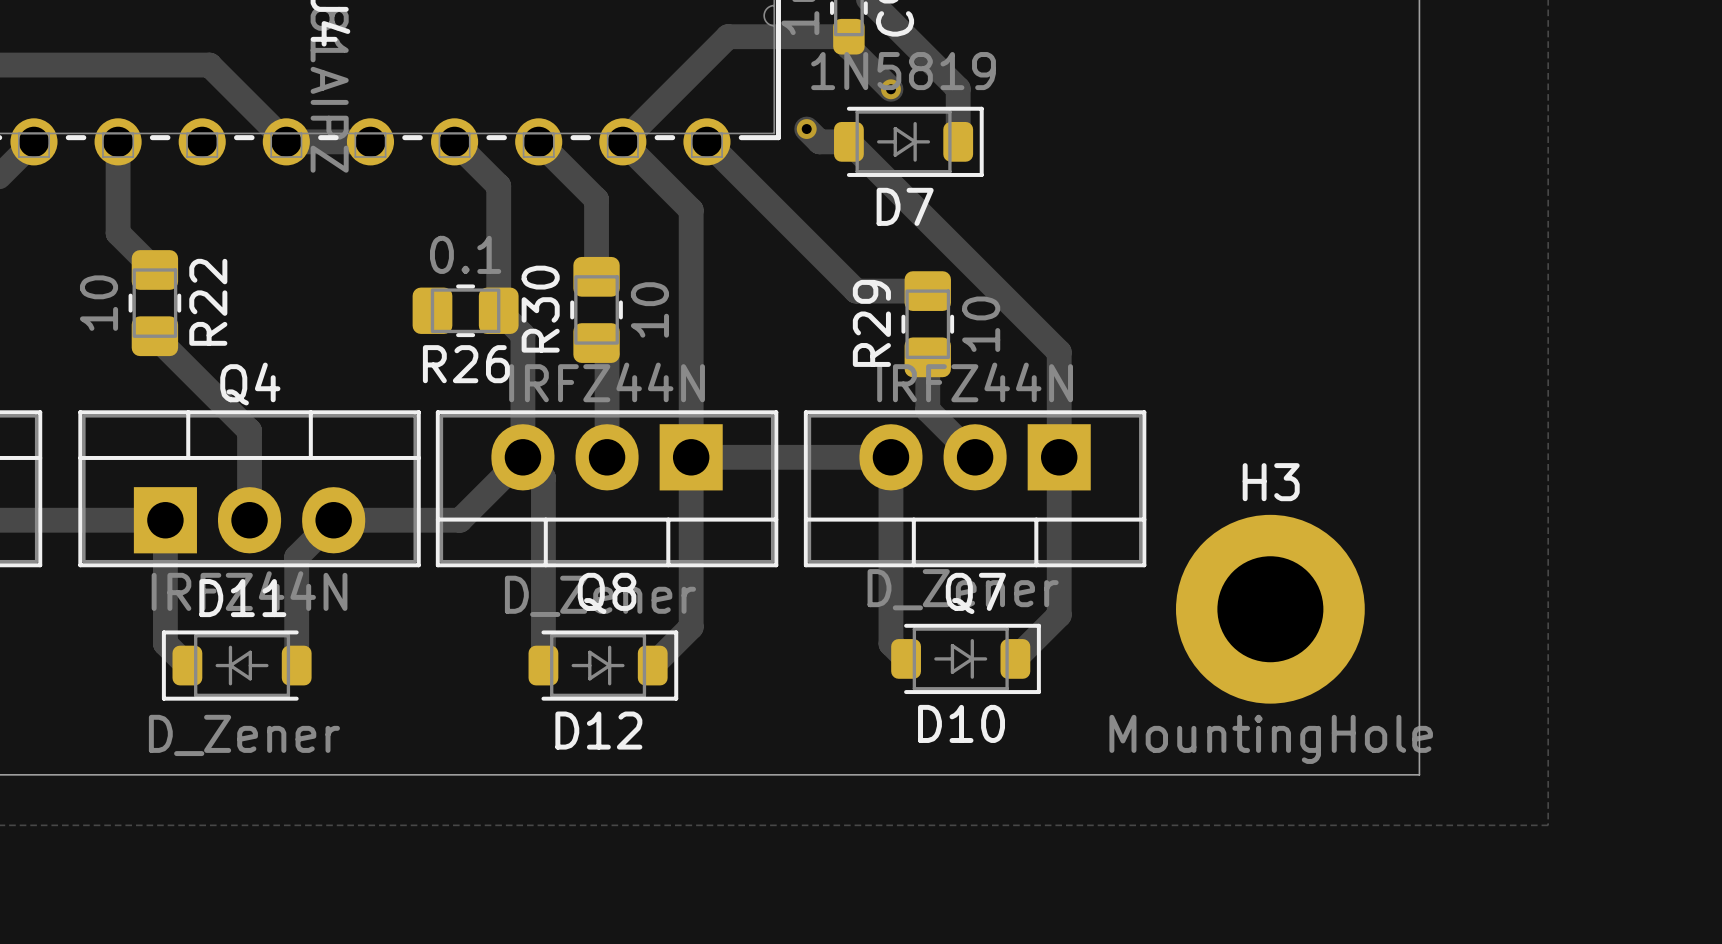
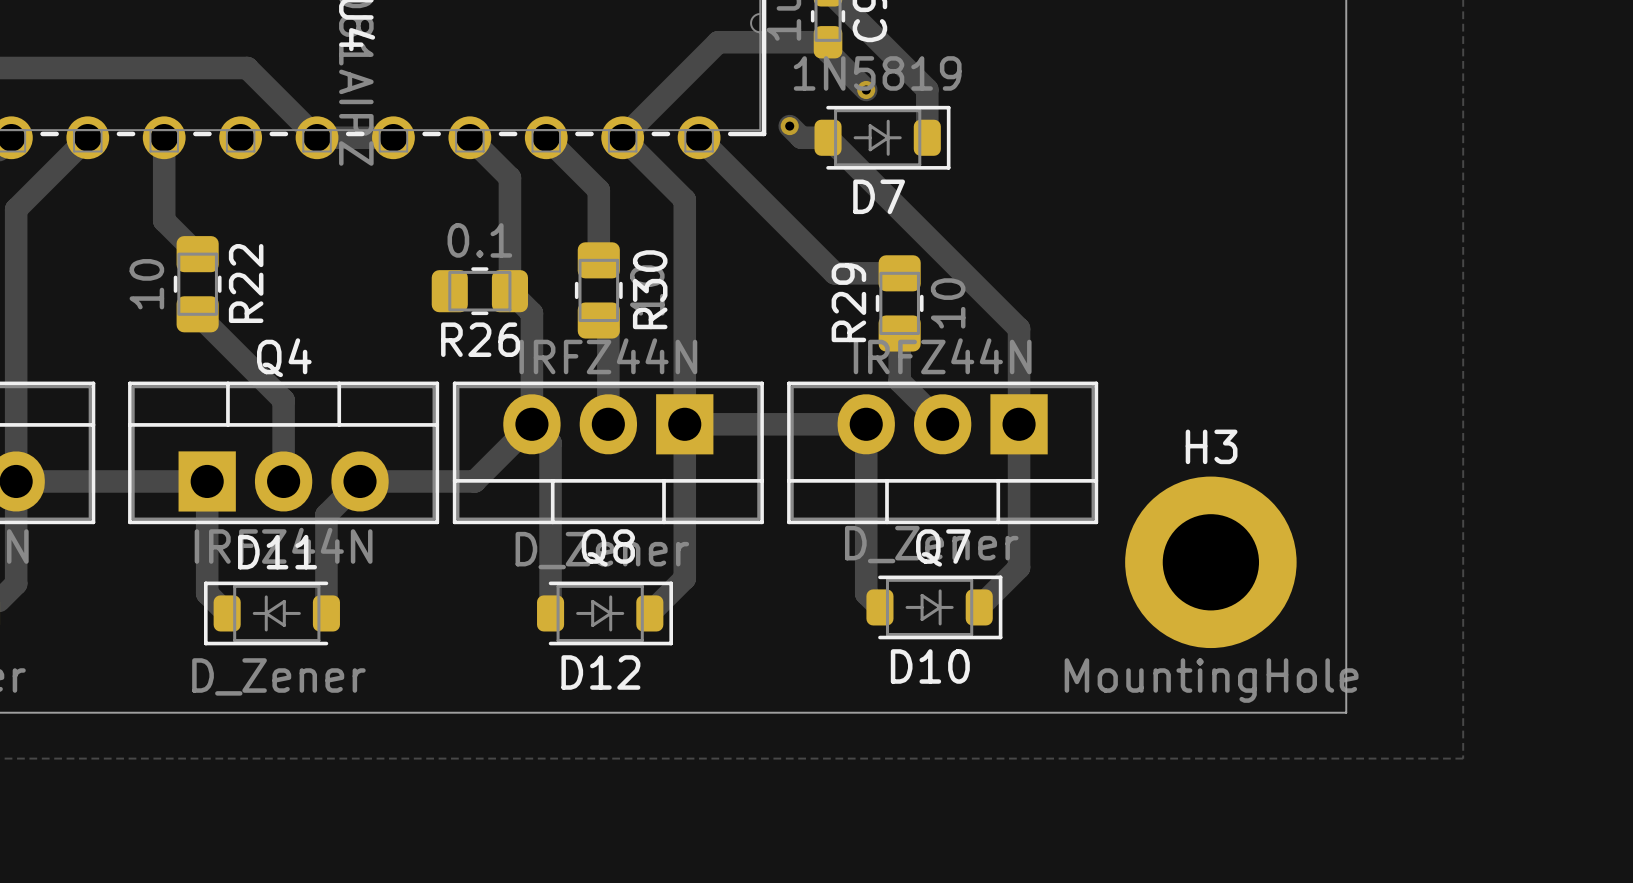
R30 name position: R30 (540, 309) -> R30 (650, 289)

